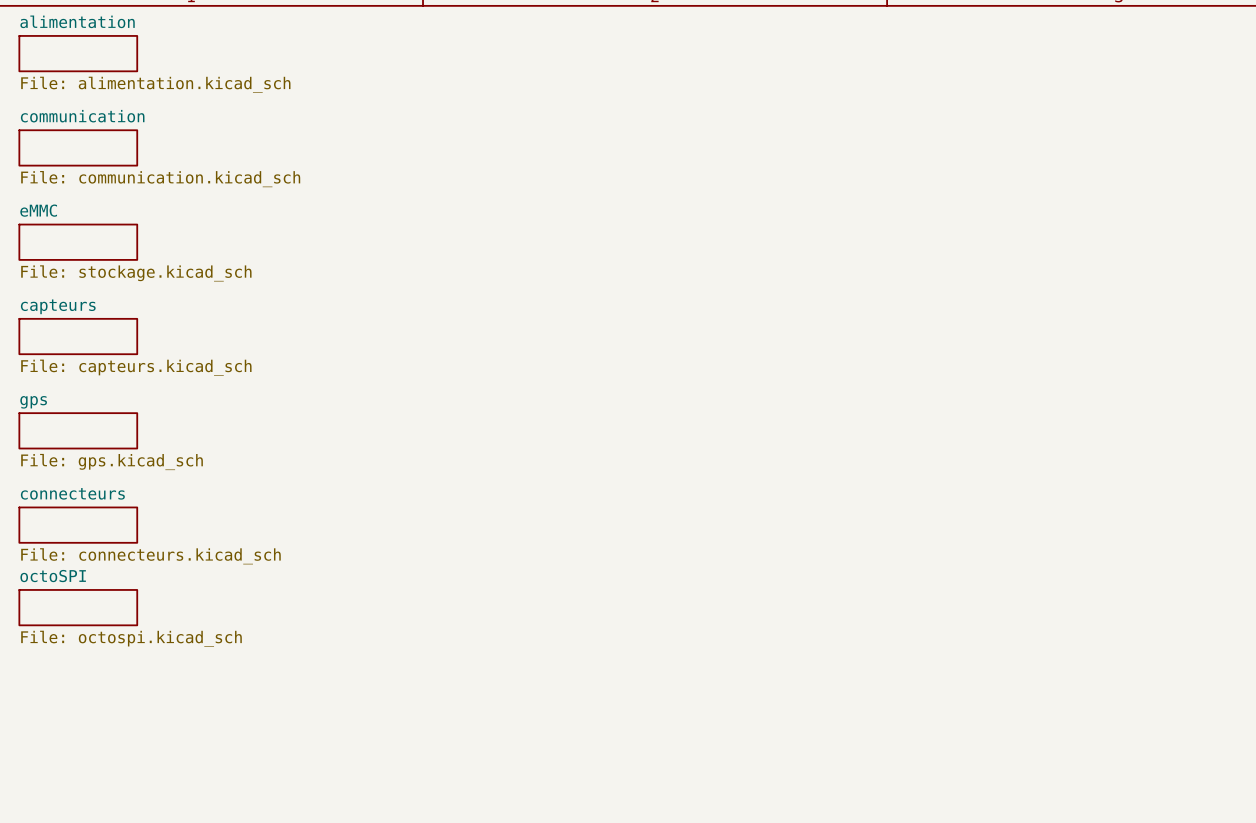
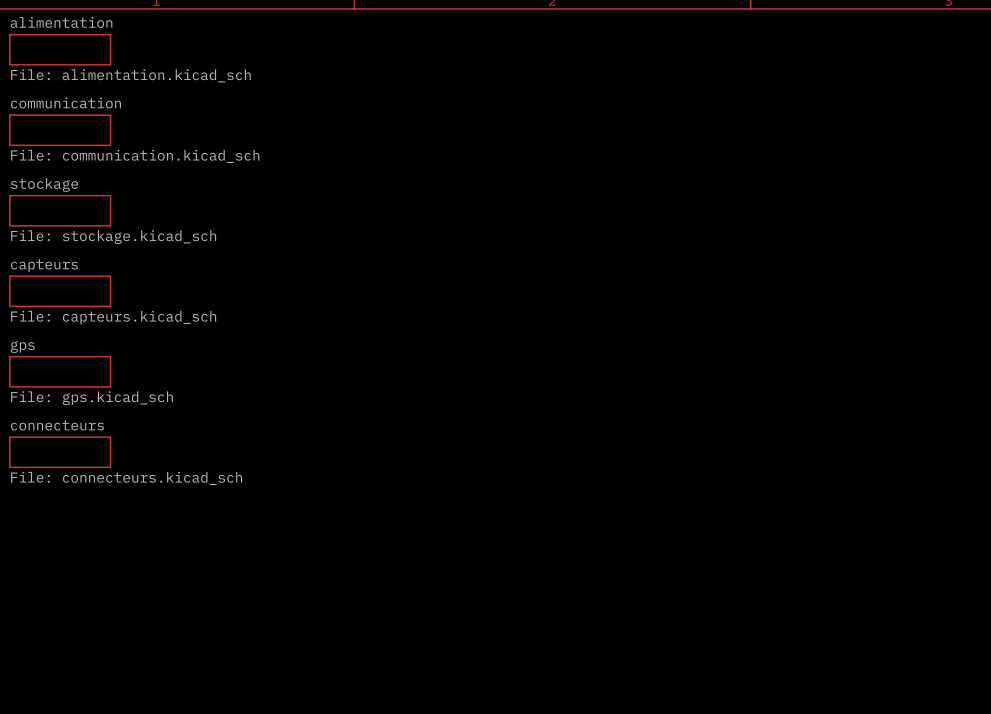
sheet eMMC name: eMMC (38, 210) -> stockage (44, 184)
sheet octoSPI: File: octospi.kicad_sch (78, 607) -> none

